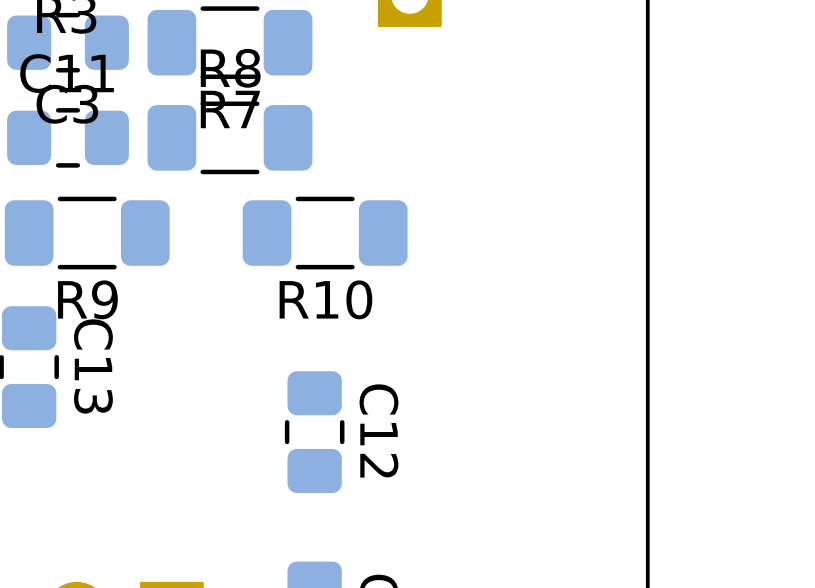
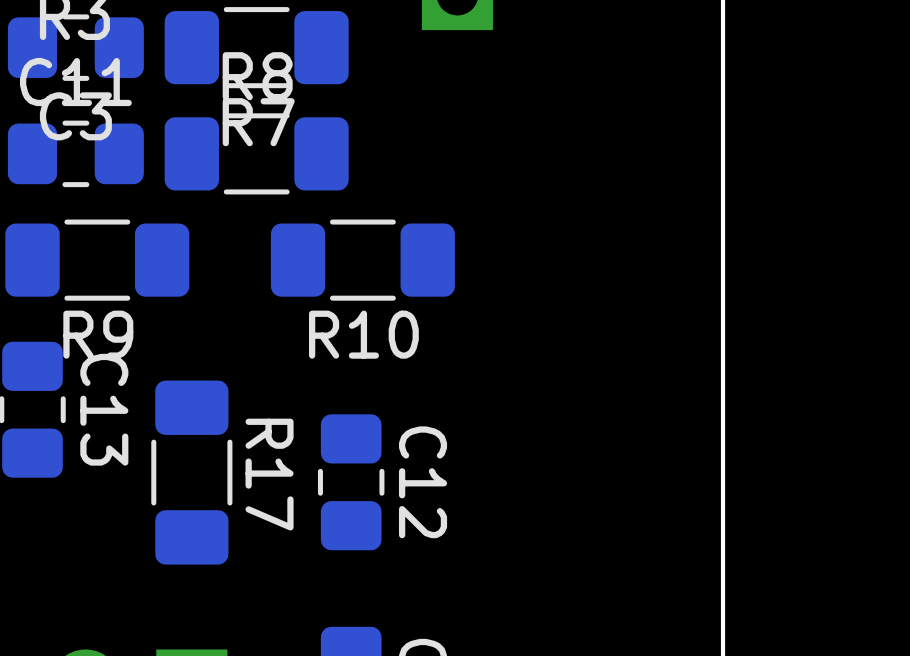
R17: none -> (191, 472)

